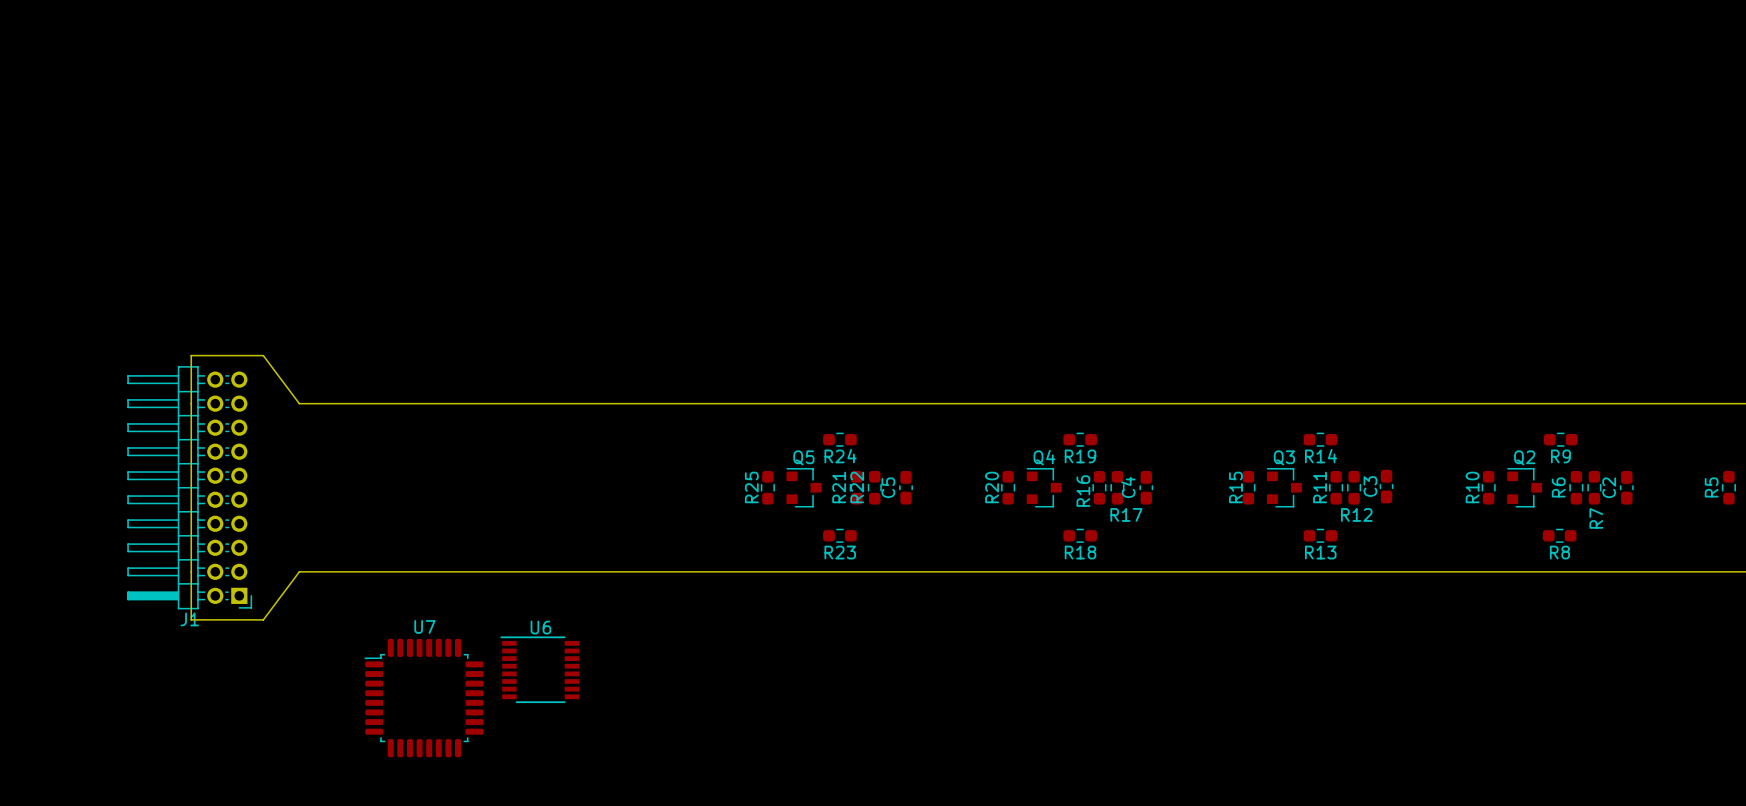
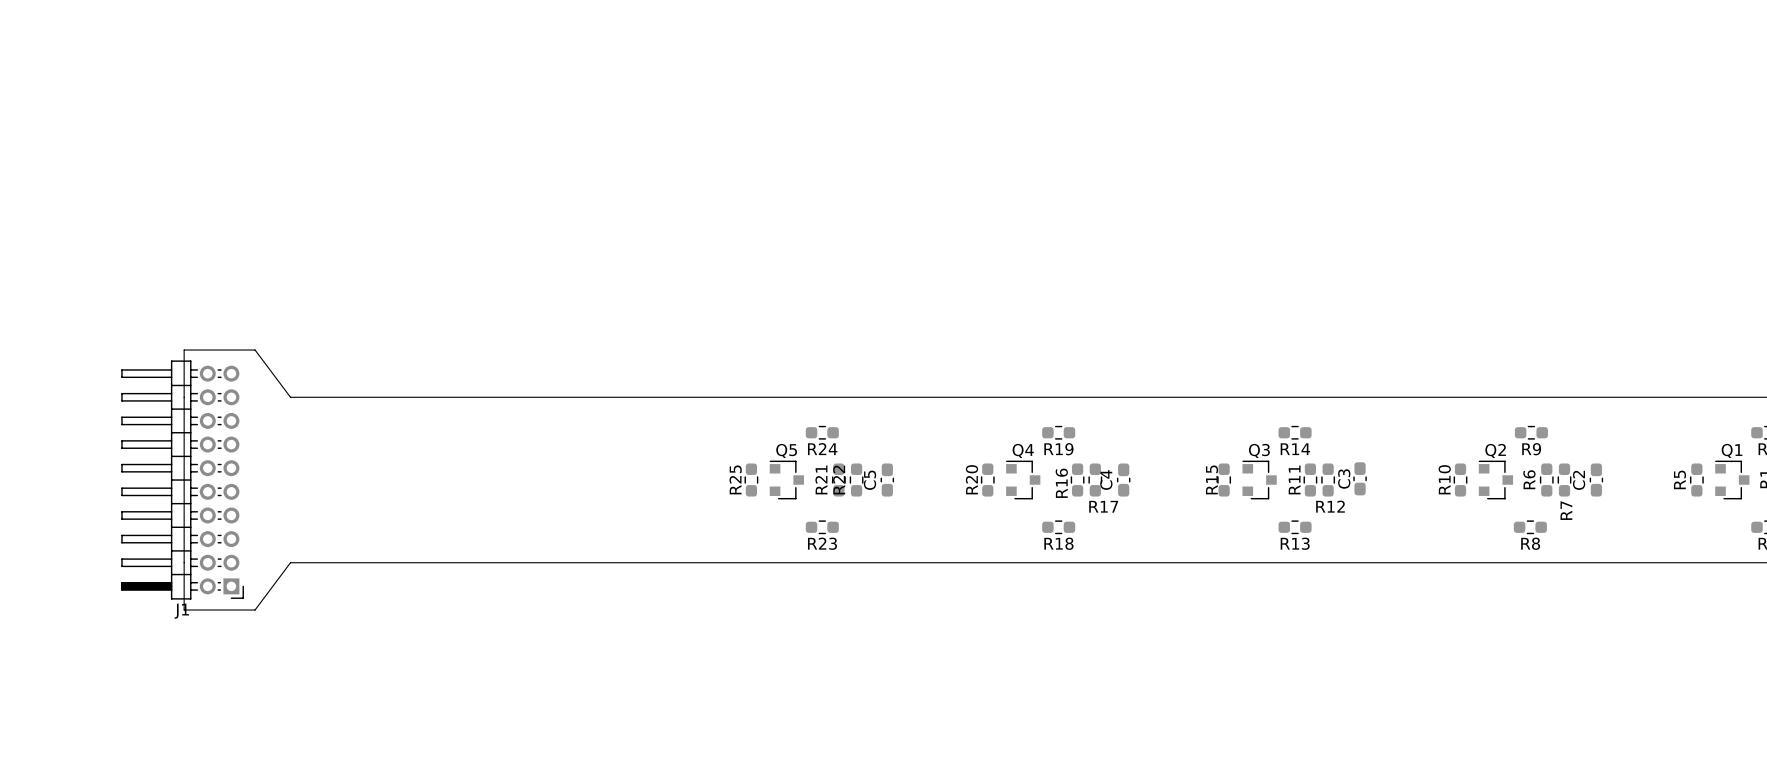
U6: (539, 669) -> none
U7: (424, 698) -> none

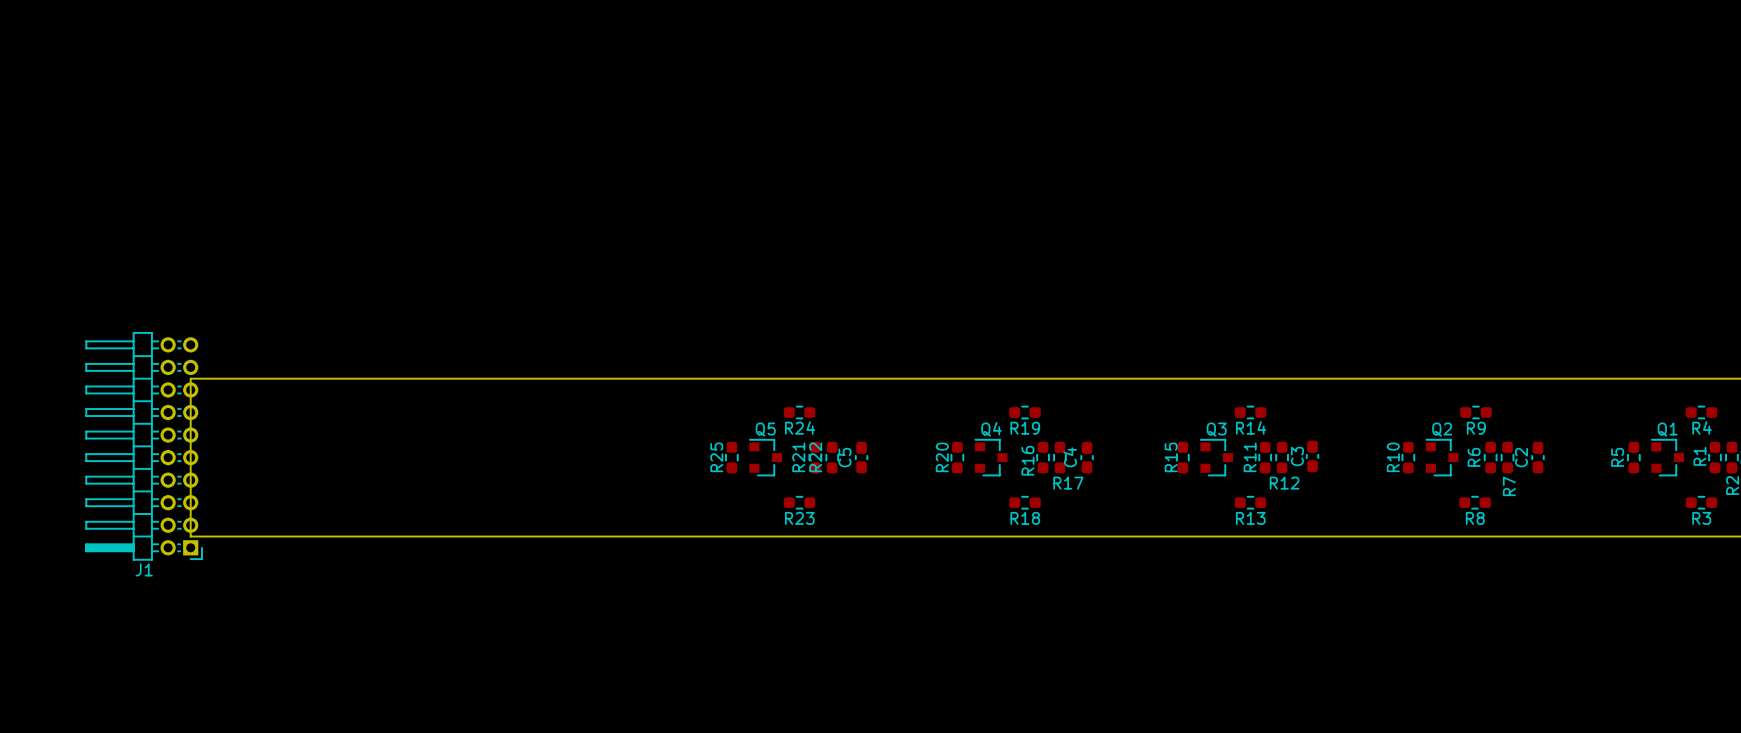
board edge: (184, 397) (184, 350) (255, 350) (290, 397) -> (190, 378) (292, 378)
J1 position: (182, 480) -> (144, 446)
board edge: (184, 562) (184, 610) (255, 610) (290, 562) -> (190, 536) (292, 536)

